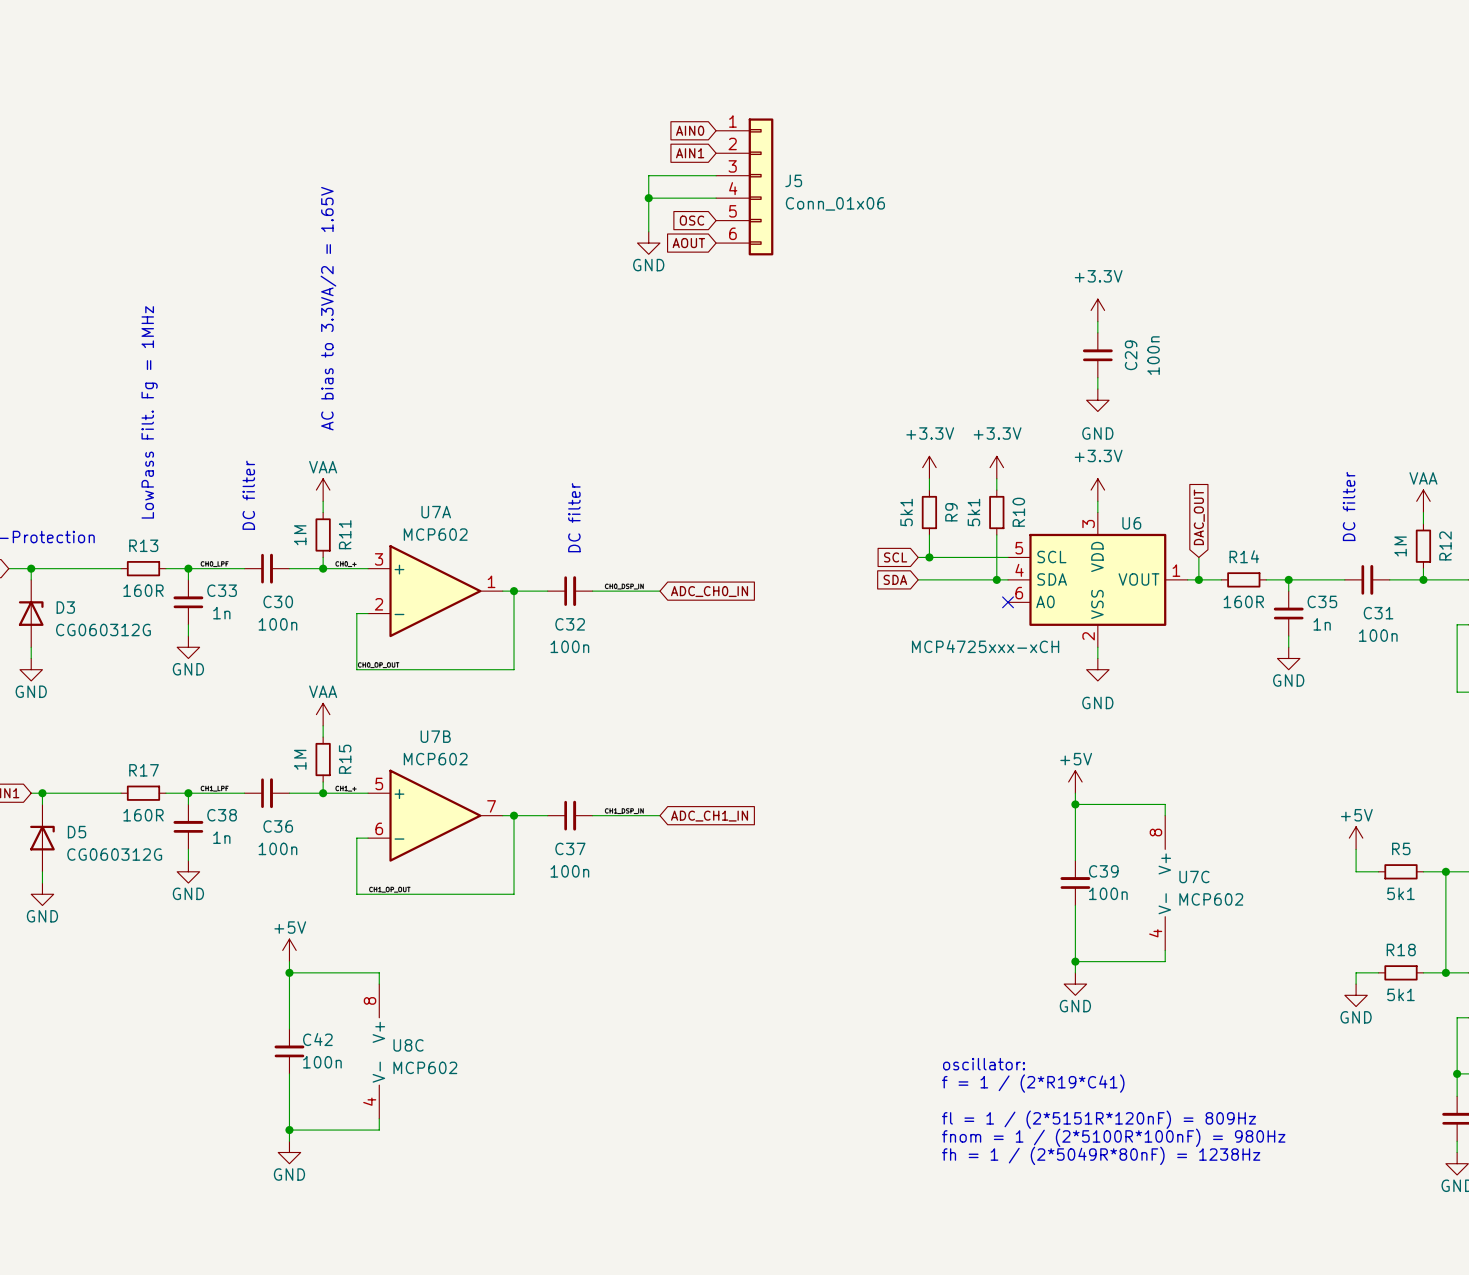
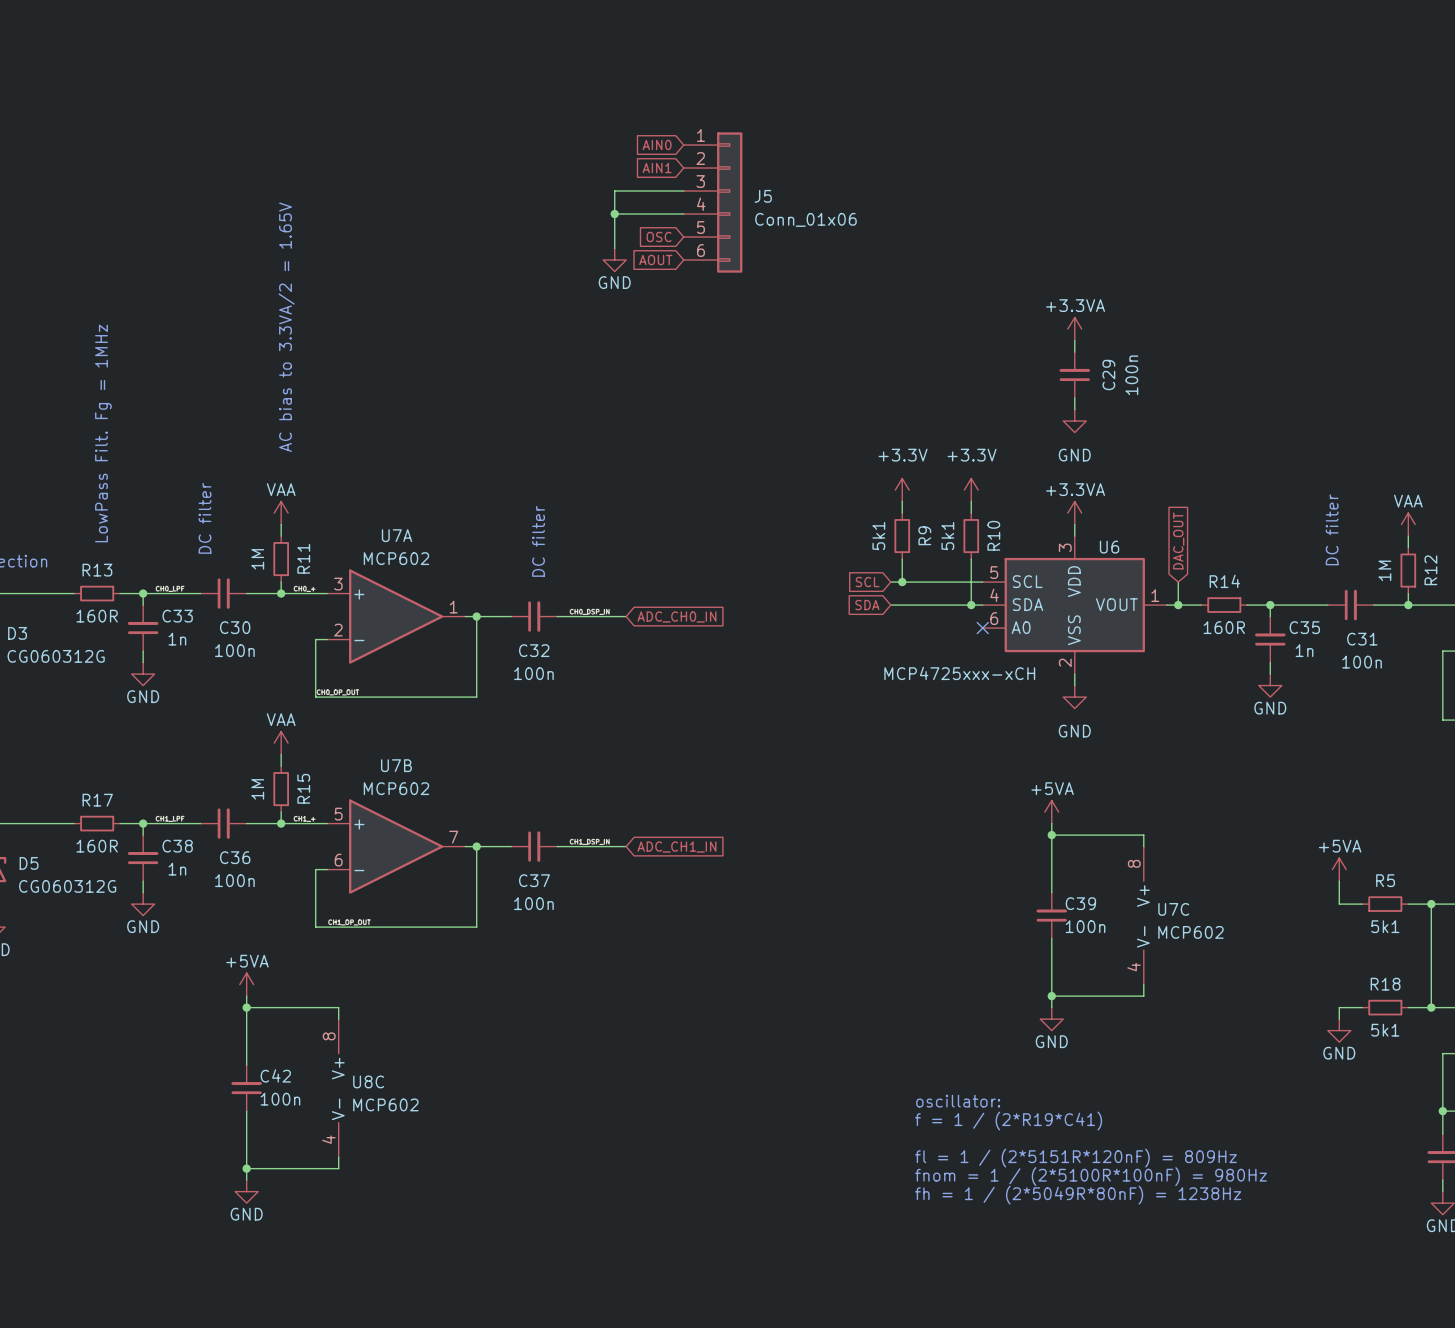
power symbol: +3.3V (1097, 310) -> +3.3VA (1074, 329)
power symbol: +3.3V (1097, 490) -> +3.3VA (1074, 513)
power symbol: +5V (1075, 781) -> +5VA (1051, 812)
power symbol: +5V (1356, 838) -> +5VA (1339, 869)
power symbol: +5V (289, 950) -> +5VA (246, 984)

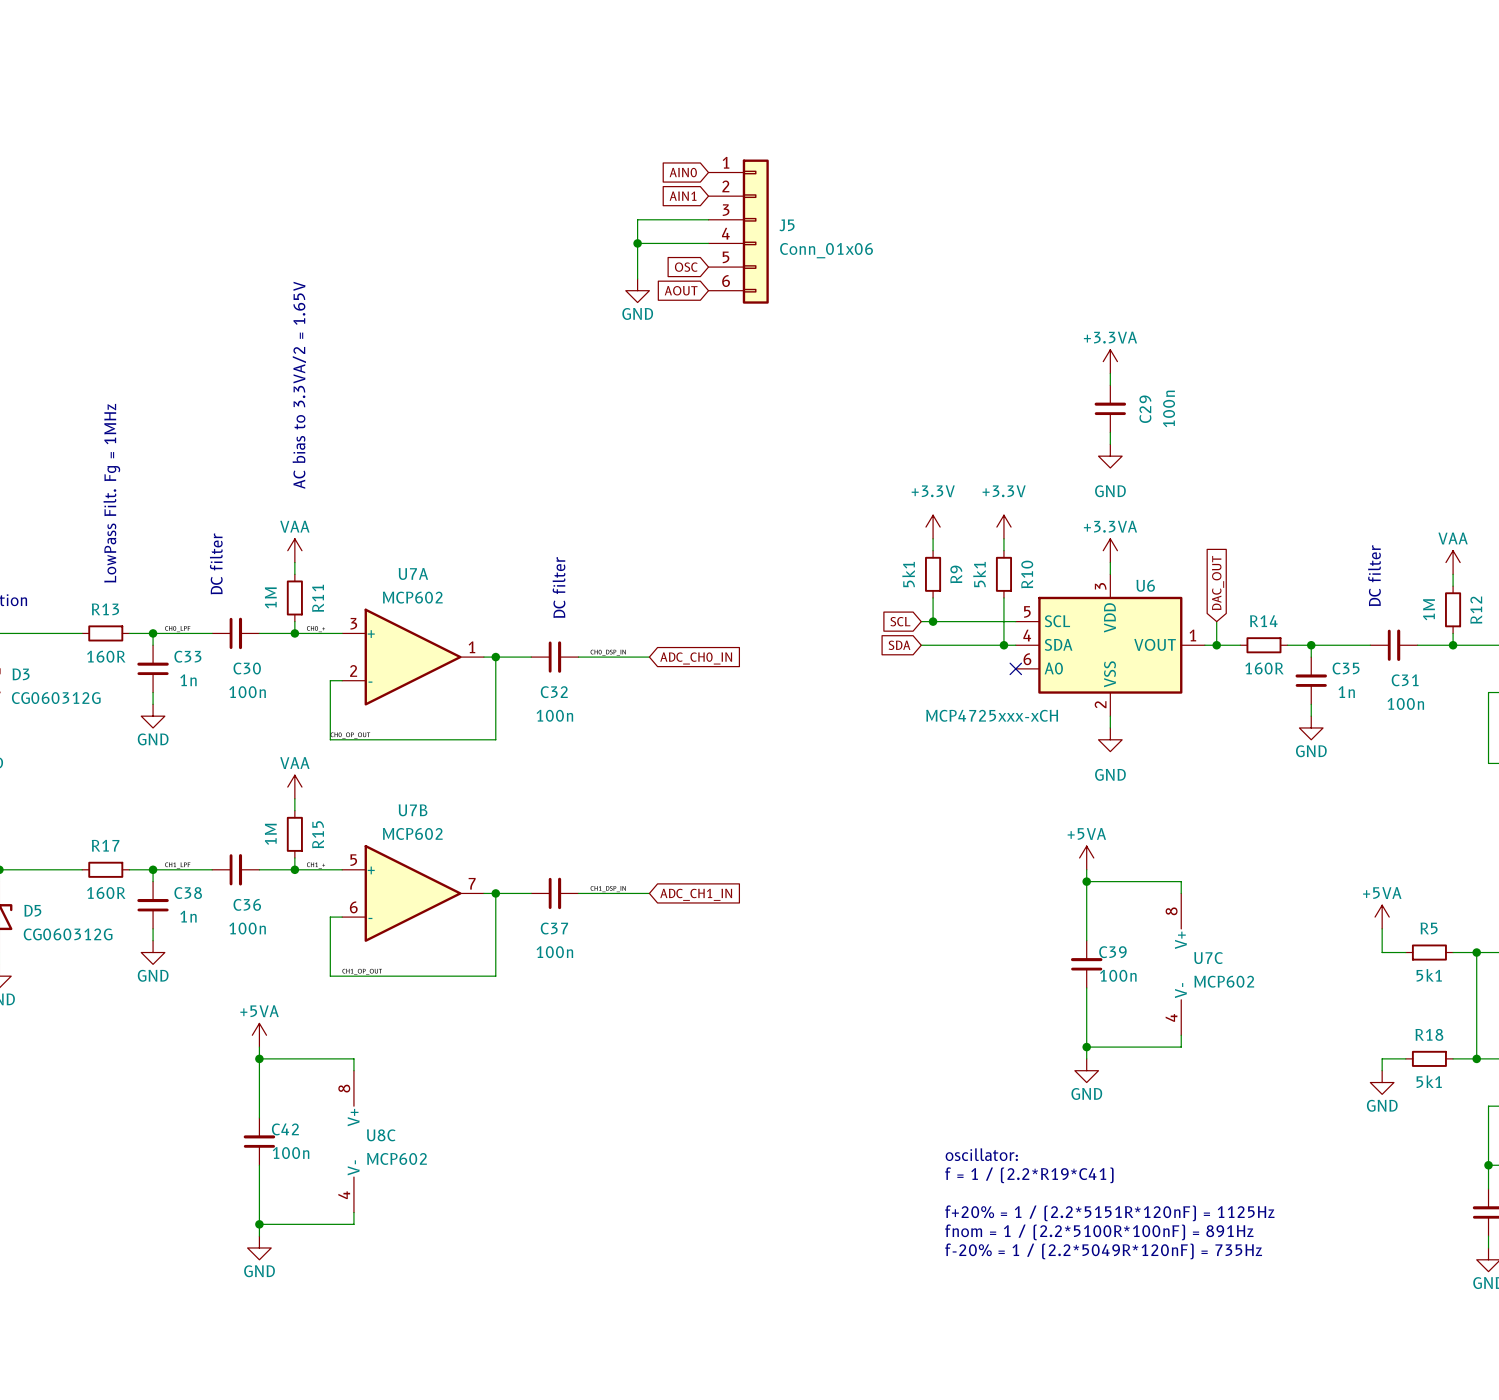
text: f = 1 / (2*R19*C41) (1008, 1121) -> f = 1 / (2.2*R19*C41) (1029, 1175)
text: fl = 1 / (2*5151R*120nF) = 809Hz (1075, 1158) -> f+20% = 1 / (2.2*5151R*120nF) = 1125Hz (1109, 1213)
text: fnom = 1 / (2*5100R*100nF) = 980Hz (1091, 1176) -> fnom = 1 / (2.2*5100R*100nF) = 891Hz (1099, 1232)
text: fh = 1 / (2*5049R*80nF) = 1238Hz (1078, 1195) -> f-20% = 1 / (2.2*5049R*120nF) = 735Hz (1103, 1251)

